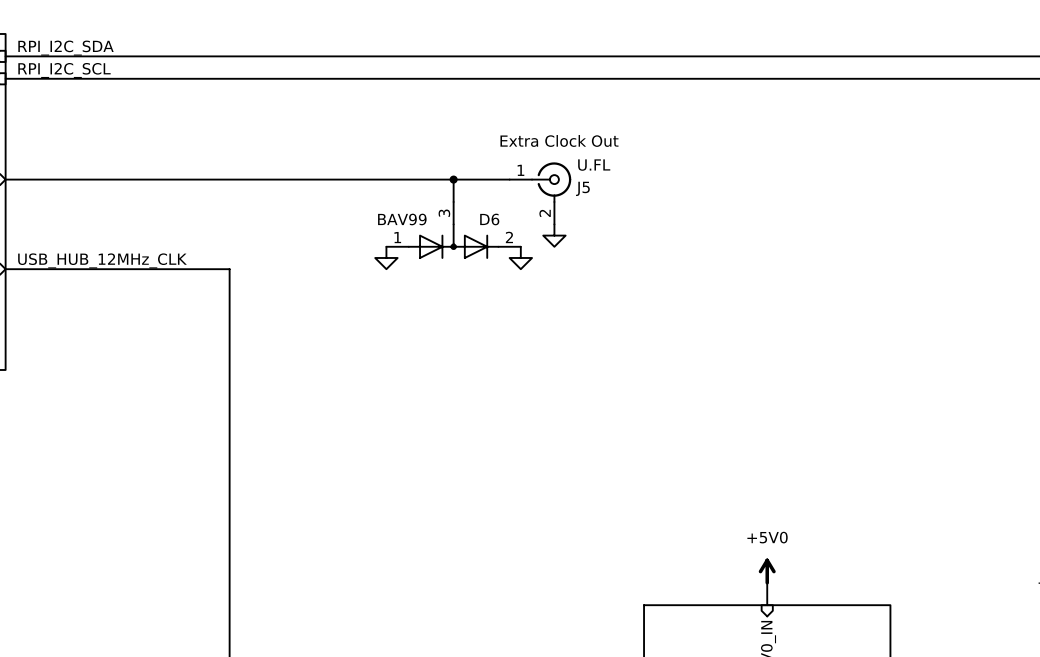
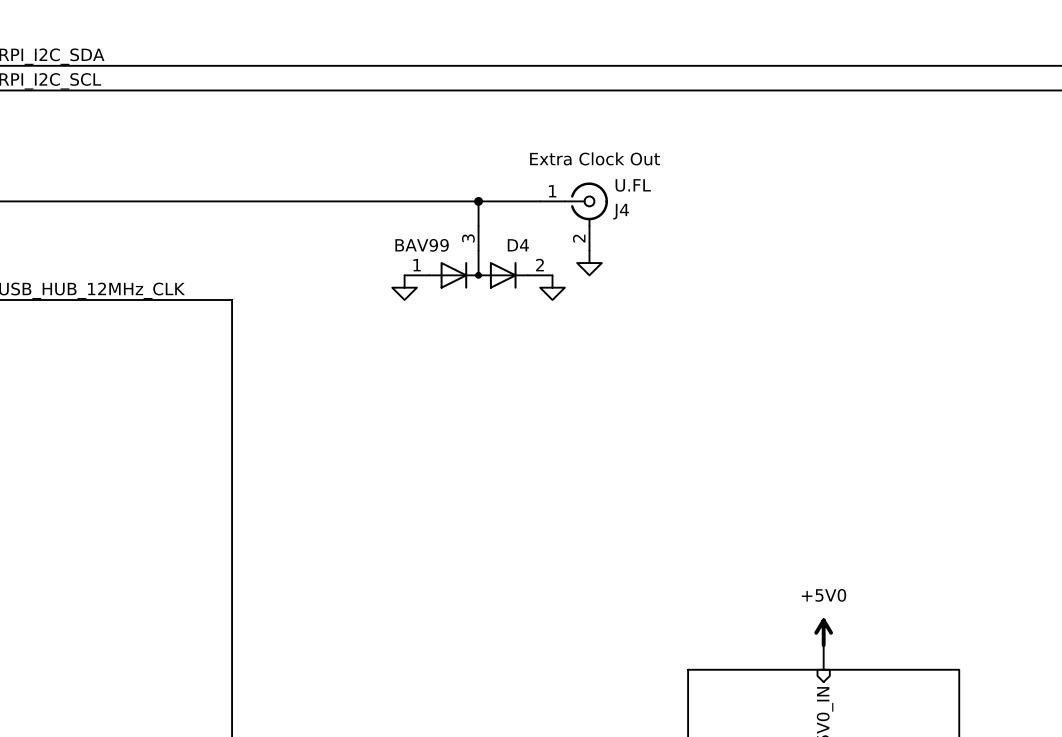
J5 name: J5 (582, 188) -> J4 (621, 211)
D6 name: D6 (489, 219) -> D4 (518, 245)

